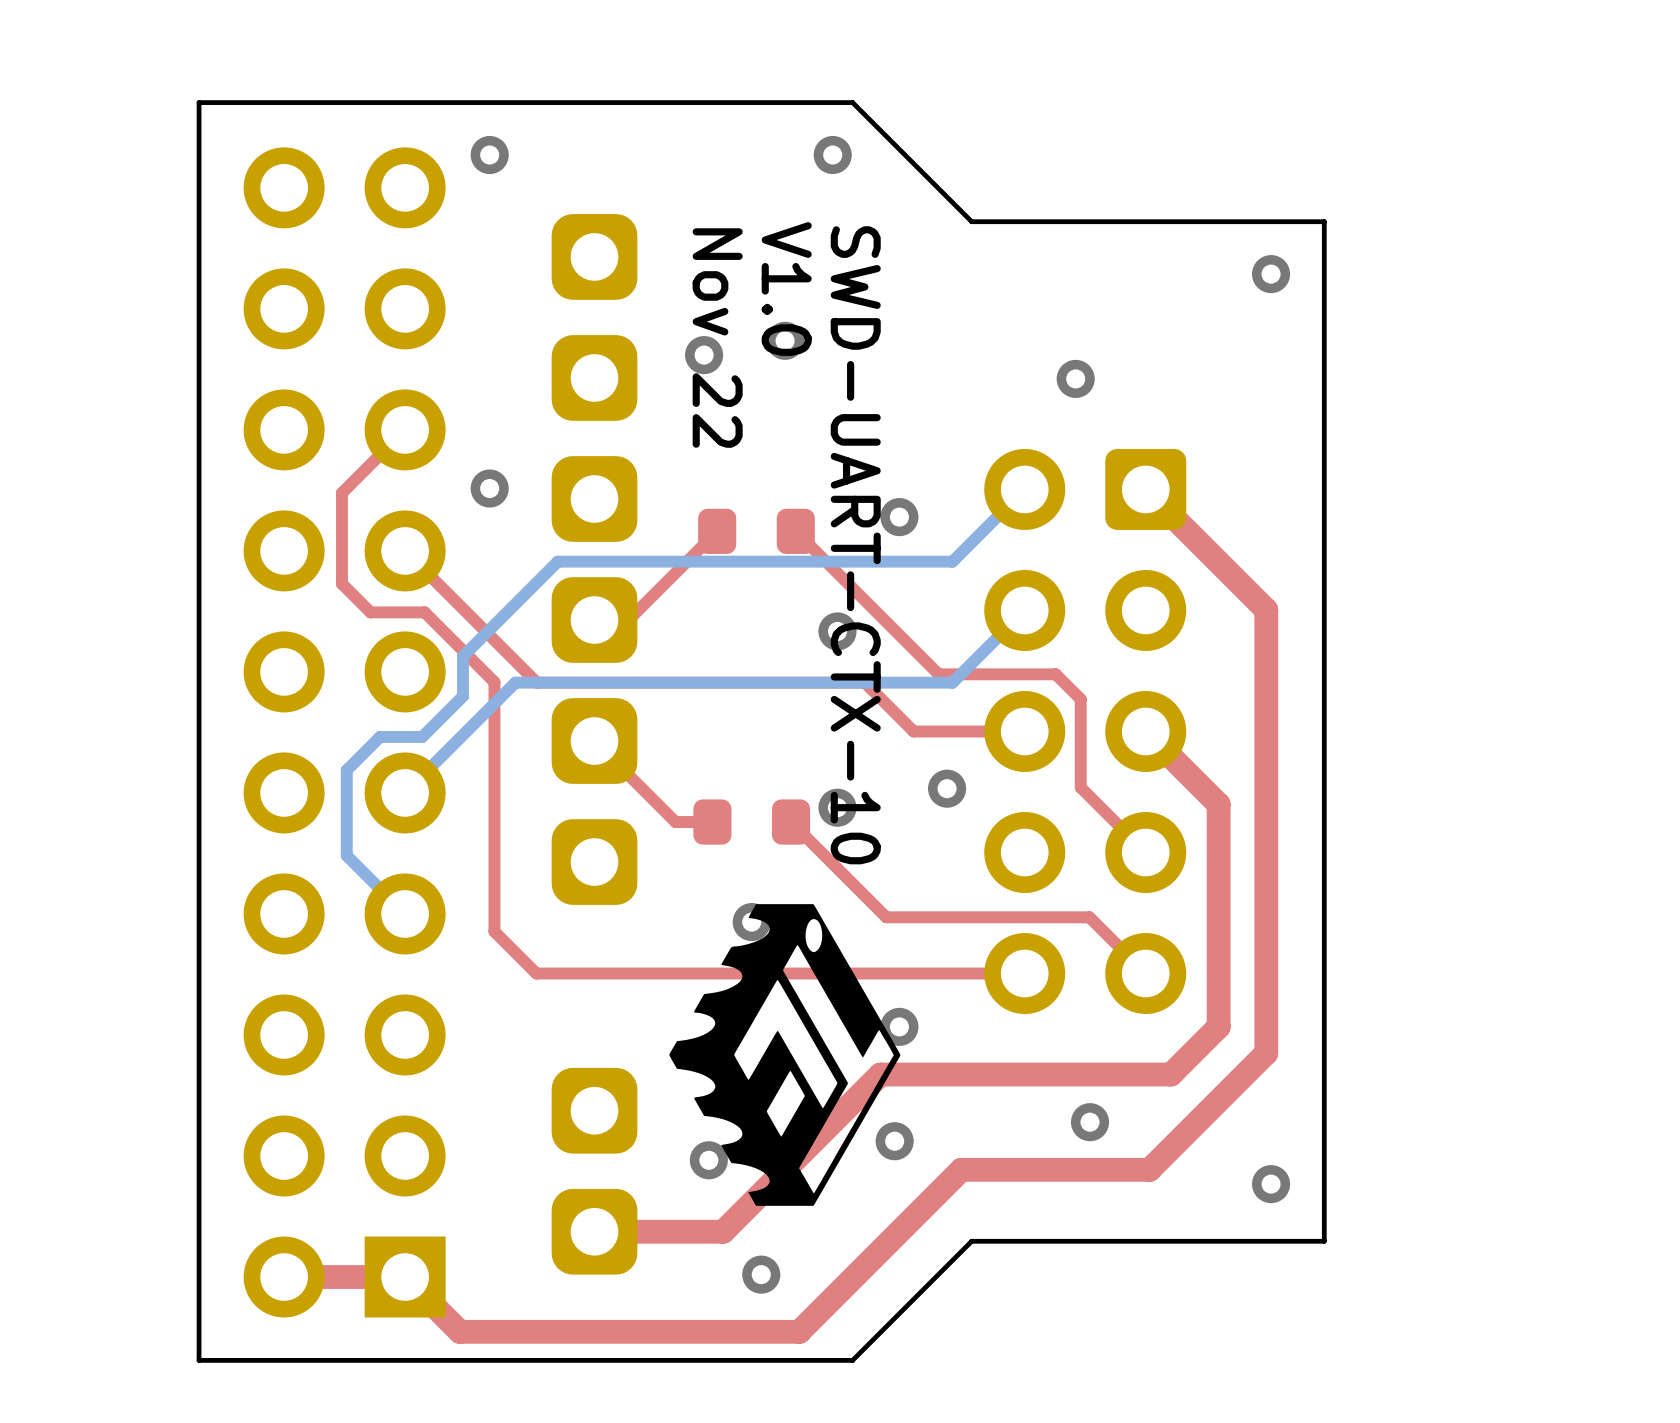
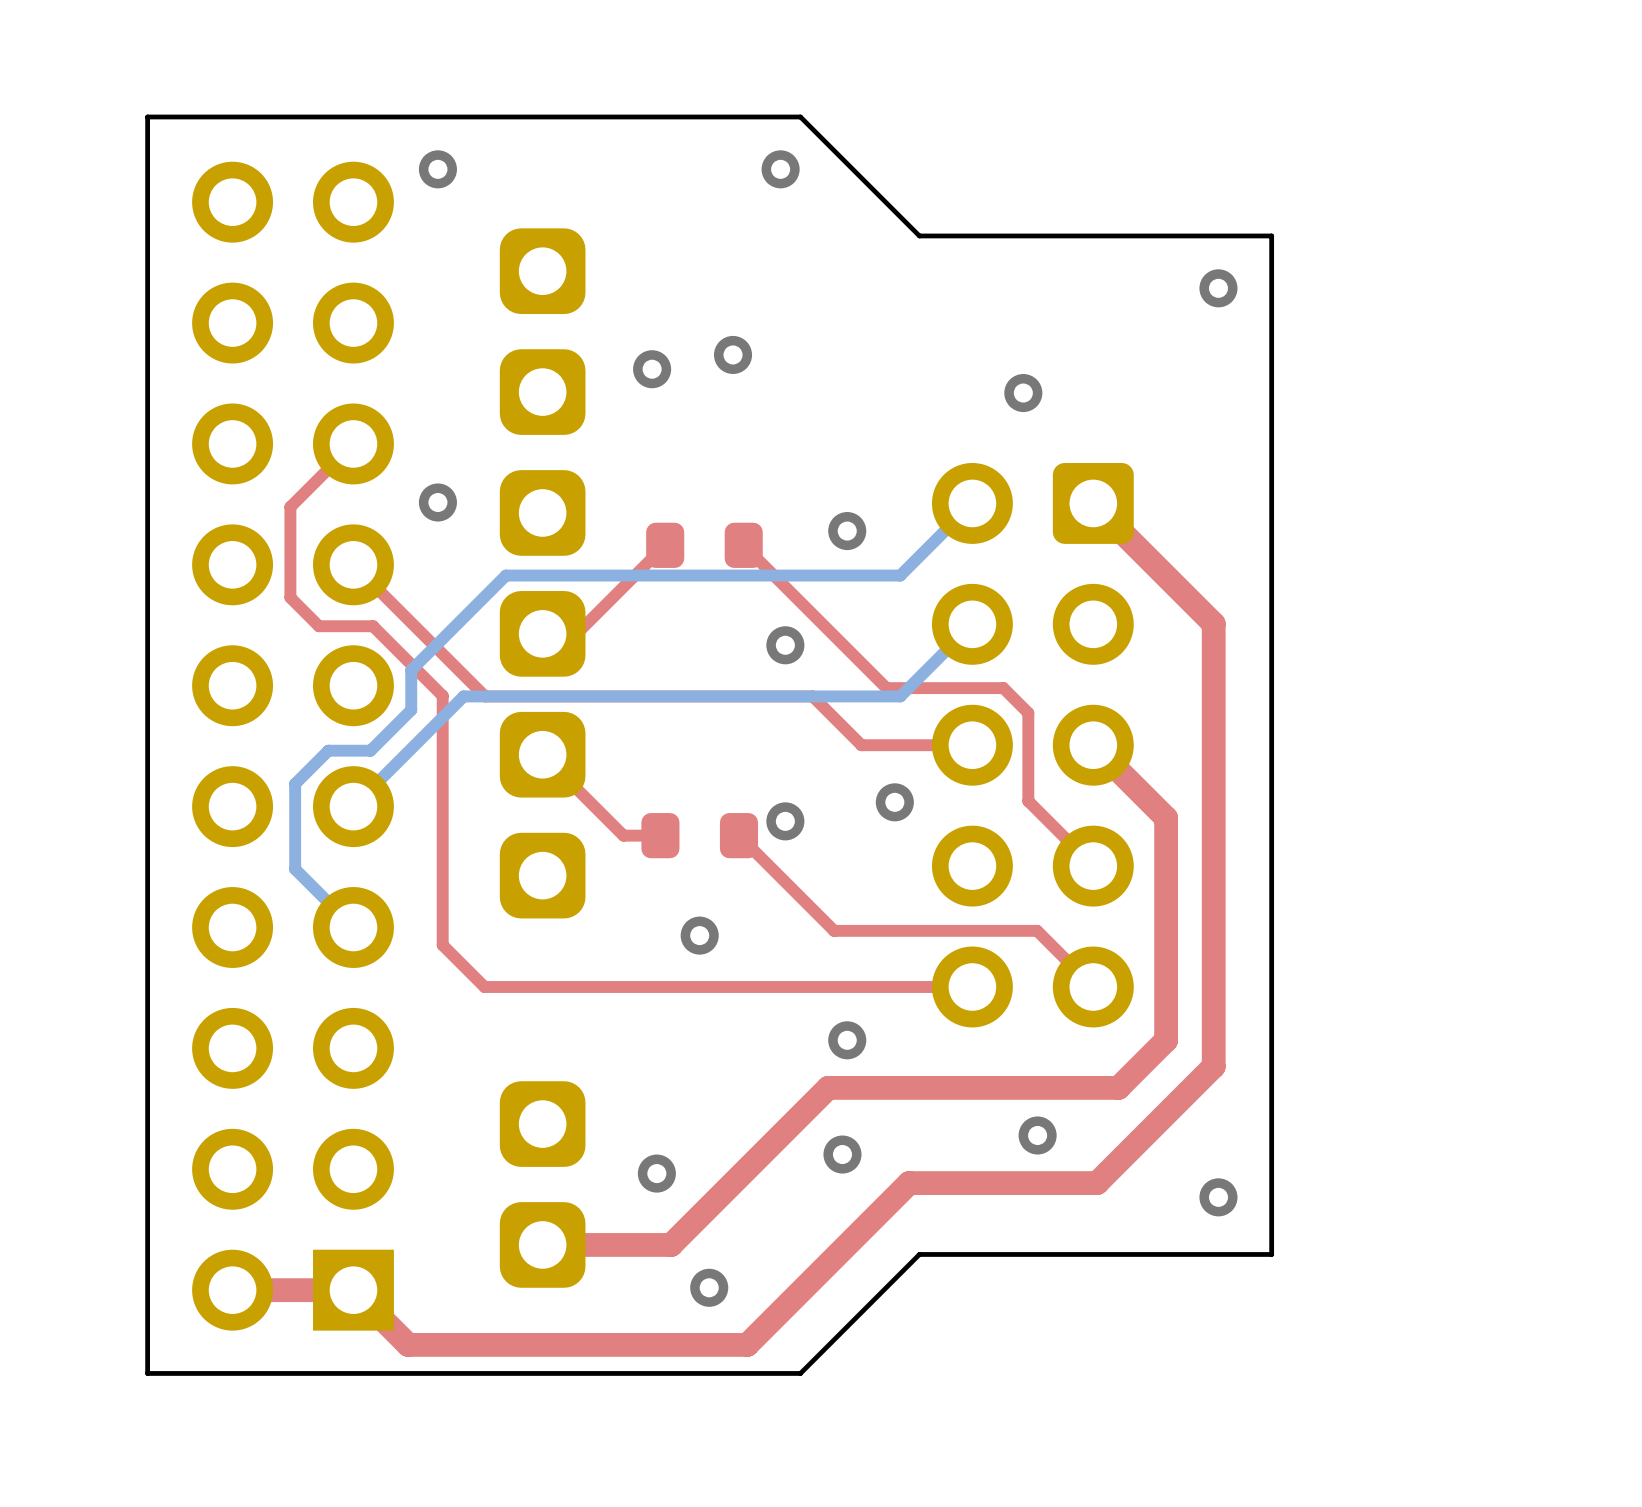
text: V1.0 (786, 289) -> none
text: Nov 22 (717, 338) -> none
text: SWD-UART-CTX-10 (855, 545) -> none
drawing: [669, 904, 901, 1206] -> none

